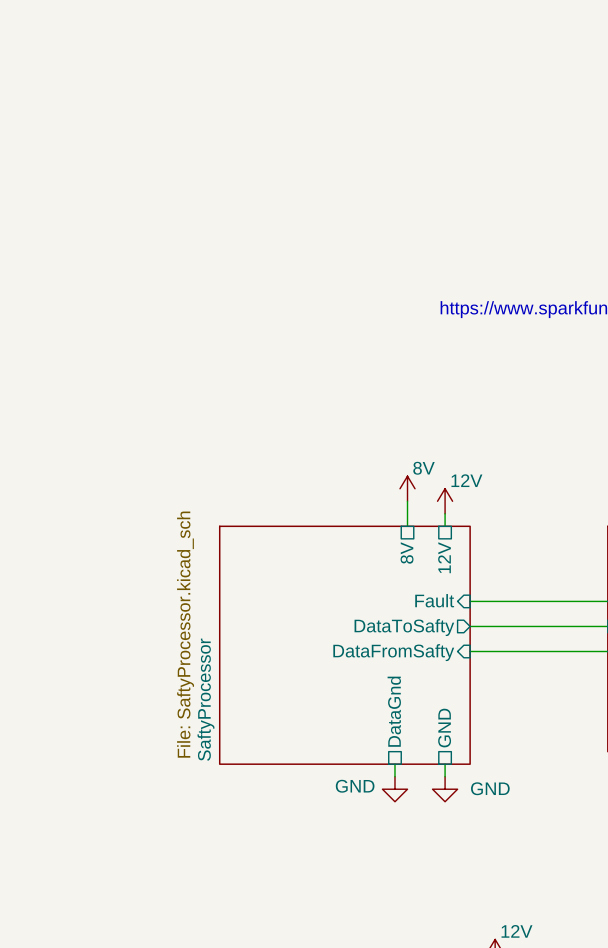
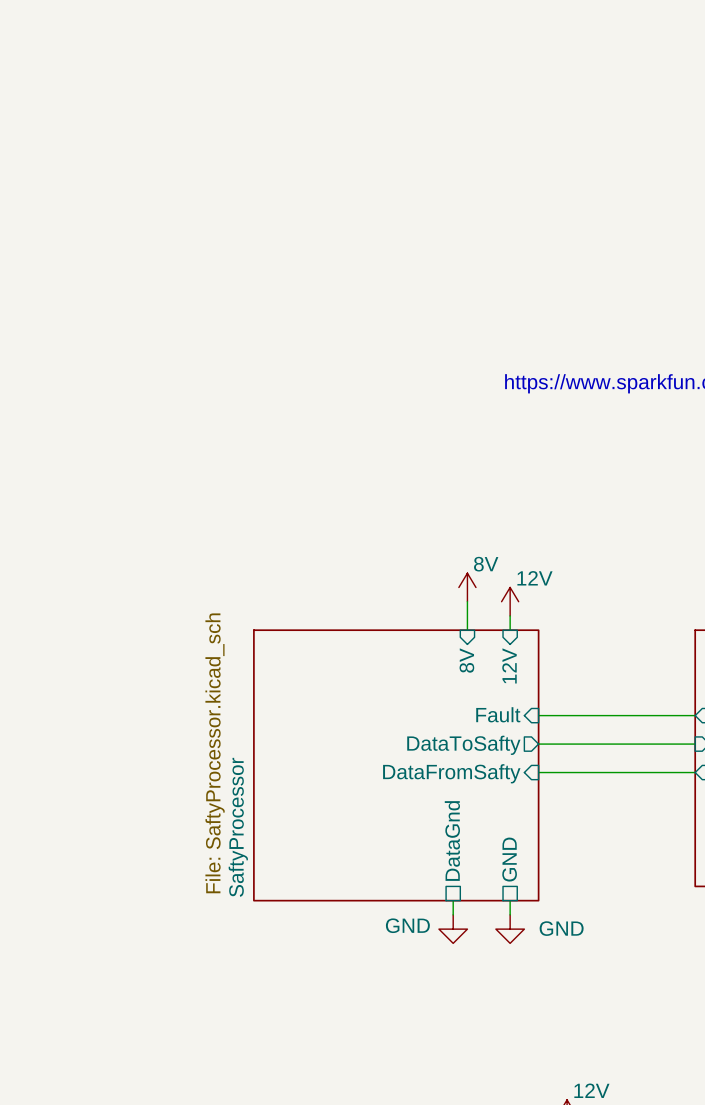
sheet pin shape: passive (407, 552) -> input (466, 660)
sheet pin shape: passive (444, 557) -> input (509, 665)

